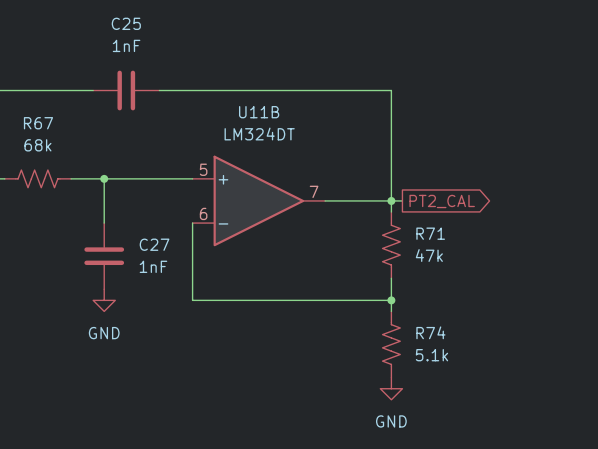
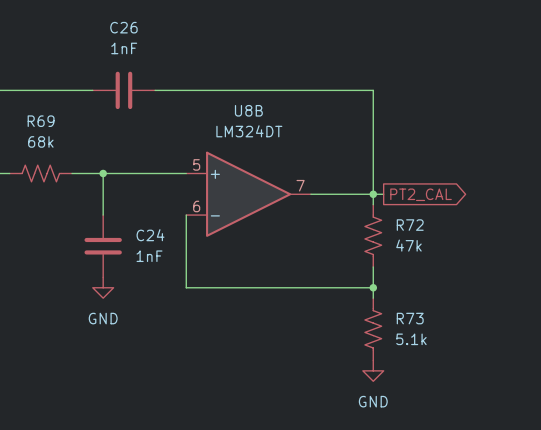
C25 name: C25 (126, 23) -> C26 (123, 27)
U11B name: U11B (259, 112) -> U8B (248, 110)
R67 name: R67 (38, 123) -> R69 (41, 121)
R71 name: R71 (430, 233) -> R72 (410, 225)
C27 name: C27 (154, 244) -> C24 (150, 235)
R74 name: R74 (430, 332) -> R73 (410, 318)

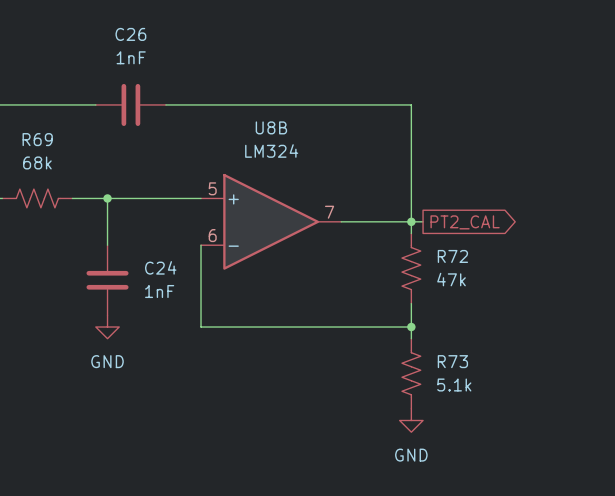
U8B value: LM324DT (249, 131) -> LM324 (271, 151)

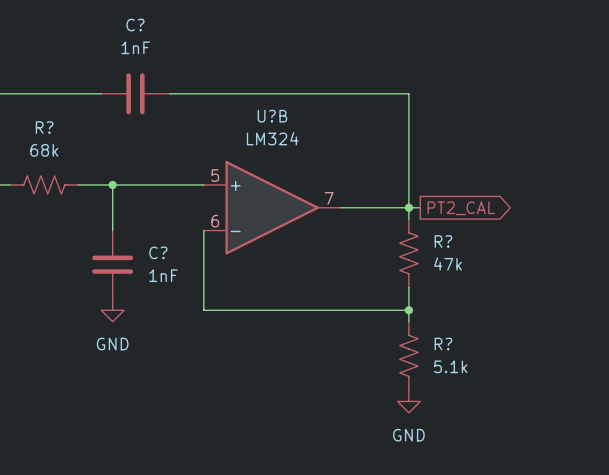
C26 name: C26 (130, 34) -> C? (135, 25)
U8B name: U8B (271, 127) -> U?B (272, 116)
R69 name: R69 (37, 139) -> R? (44, 127)
R72 name: R72 (452, 256) -> R? (443, 241)
C24 name: C24 (160, 267) -> C? (158, 252)
R73 name: R73 (452, 361) -> R? (443, 344)

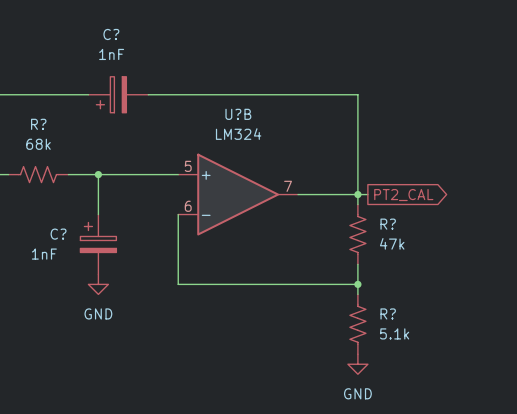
C? symbol: [101, 73, 170, 115] -> [88, 76, 149, 113]
C? symbol: [92, 230, 134, 299] -> [80, 214, 117, 275]
C? name position: C? (158, 252) -> C? (58, 234)
C? value position: 1nF (163, 275) -> 1nF (44, 254)

